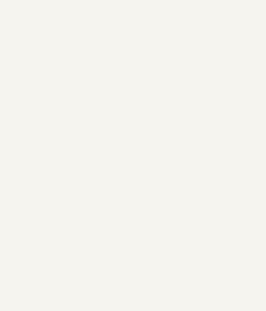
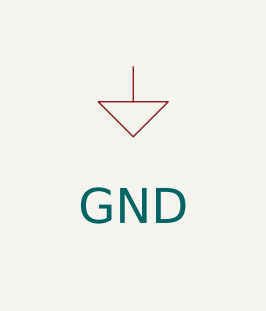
power symbol: none -> GND (133, 101)

